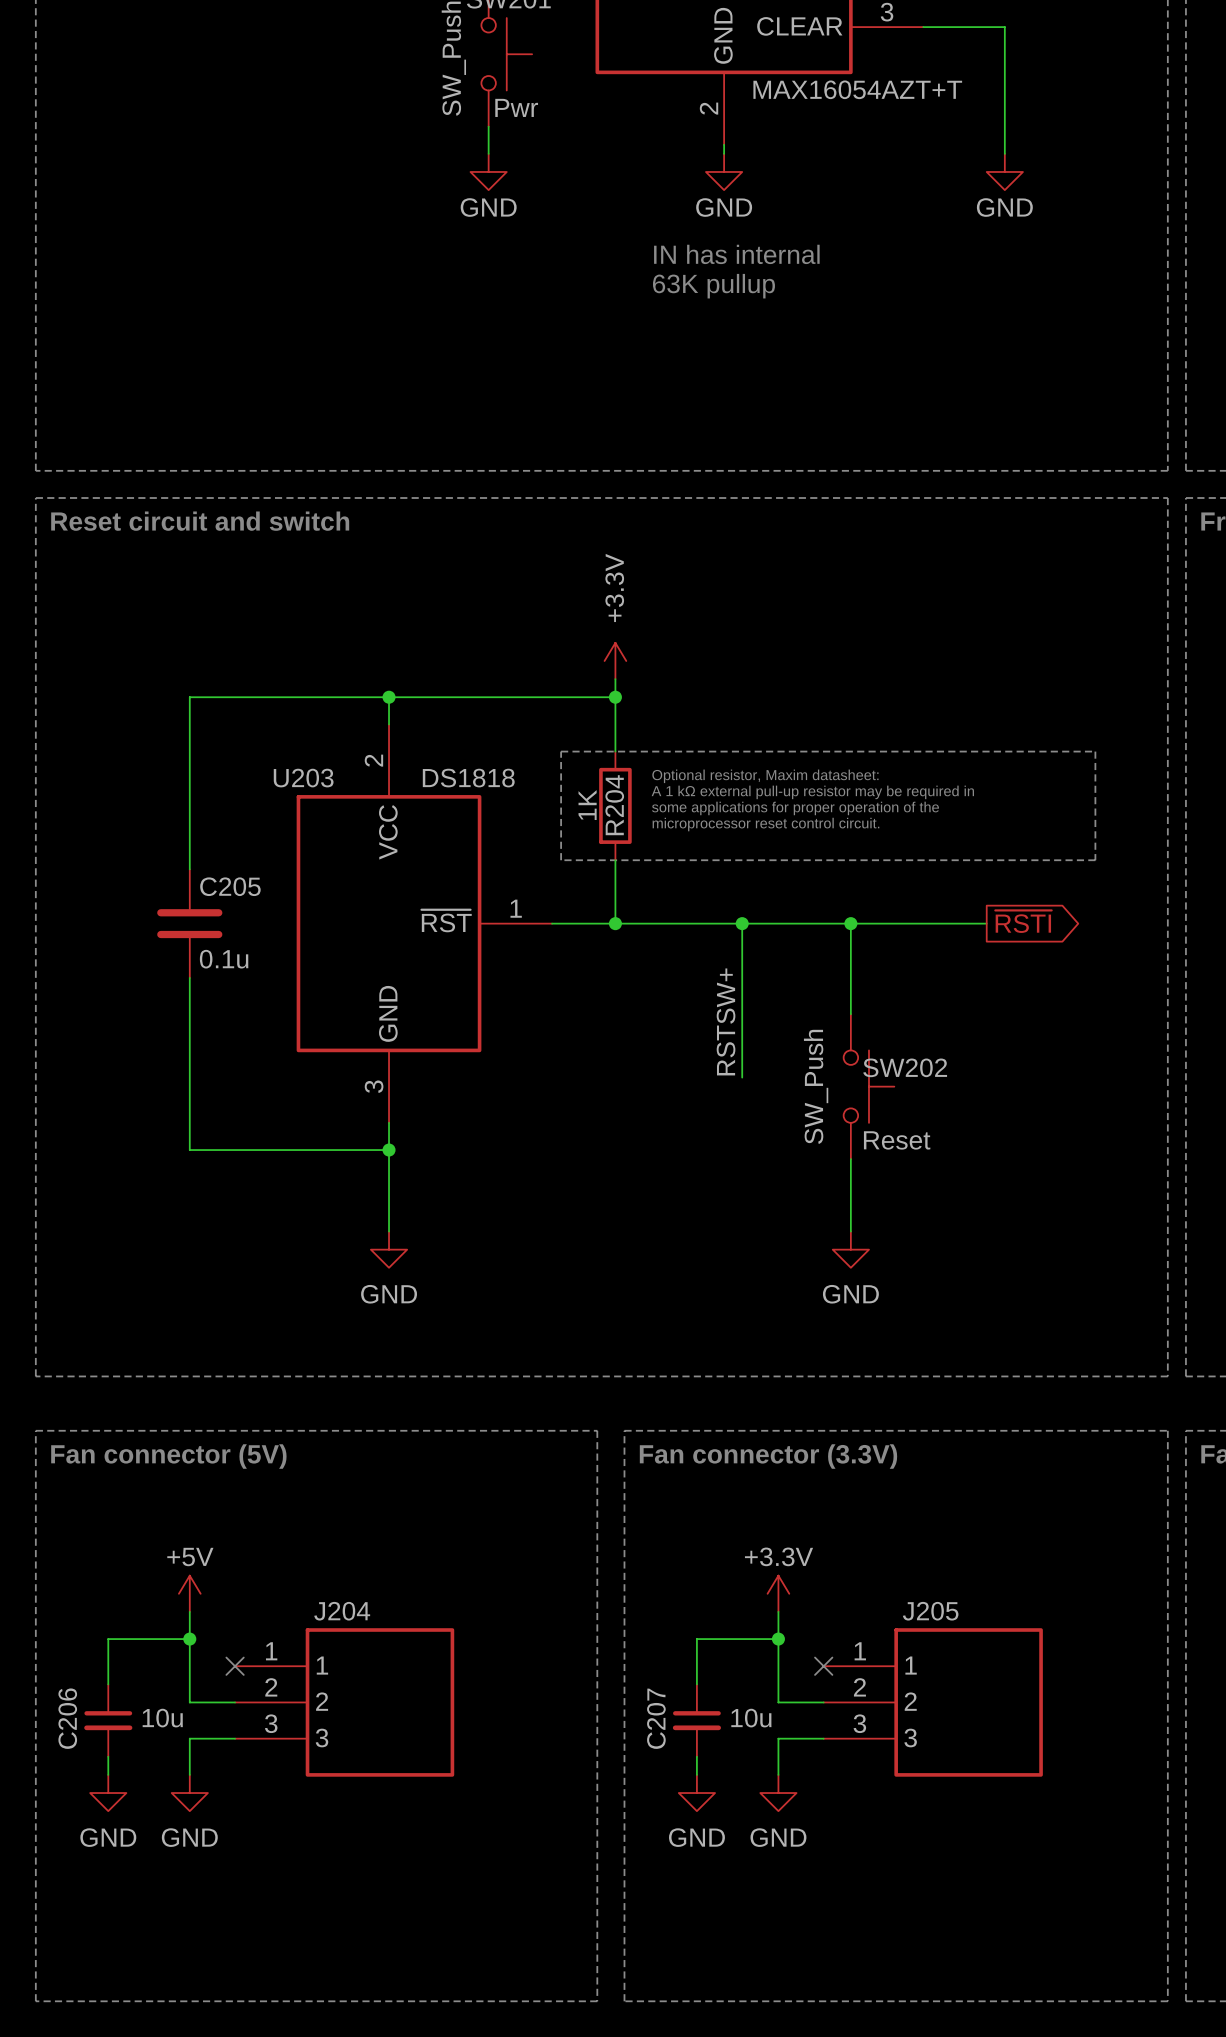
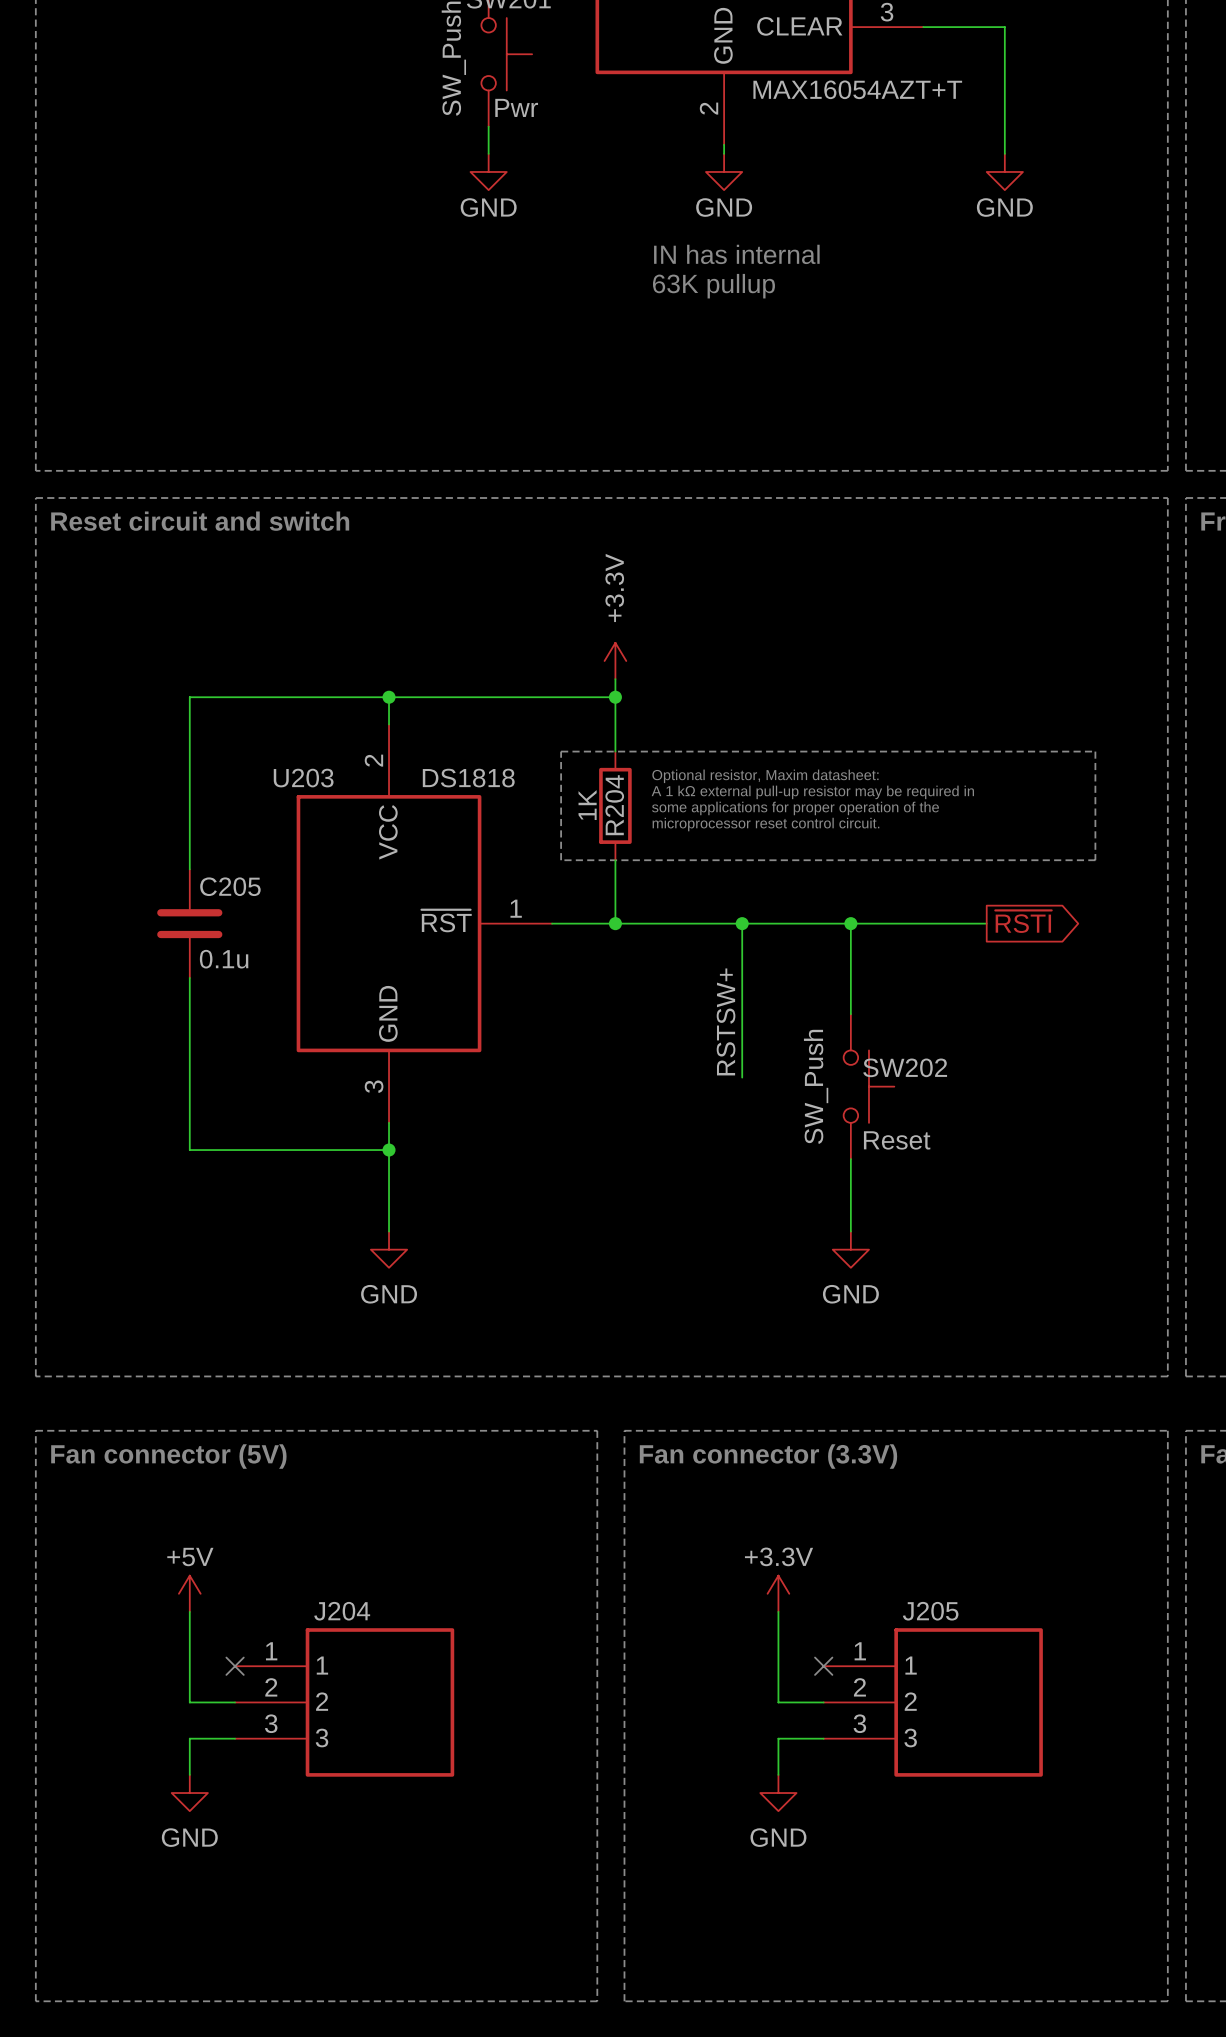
wire: (189, 1639) (108, 1639) (108, 1684) -> none
junction: (189, 1639) -> none
wire: (778, 1639) (696, 1639) (696, 1684) -> none
junction: (778, 1639) -> none
C206: 10u (108, 1720) -> none
C207: 10u (696, 1720) -> none
wire: (108, 1756) (108, 1774) -> none
wire: (696, 1756) (696, 1774) -> none
power symbol: GND (108, 1793) -> none
power symbol: GND (696, 1793) -> none

